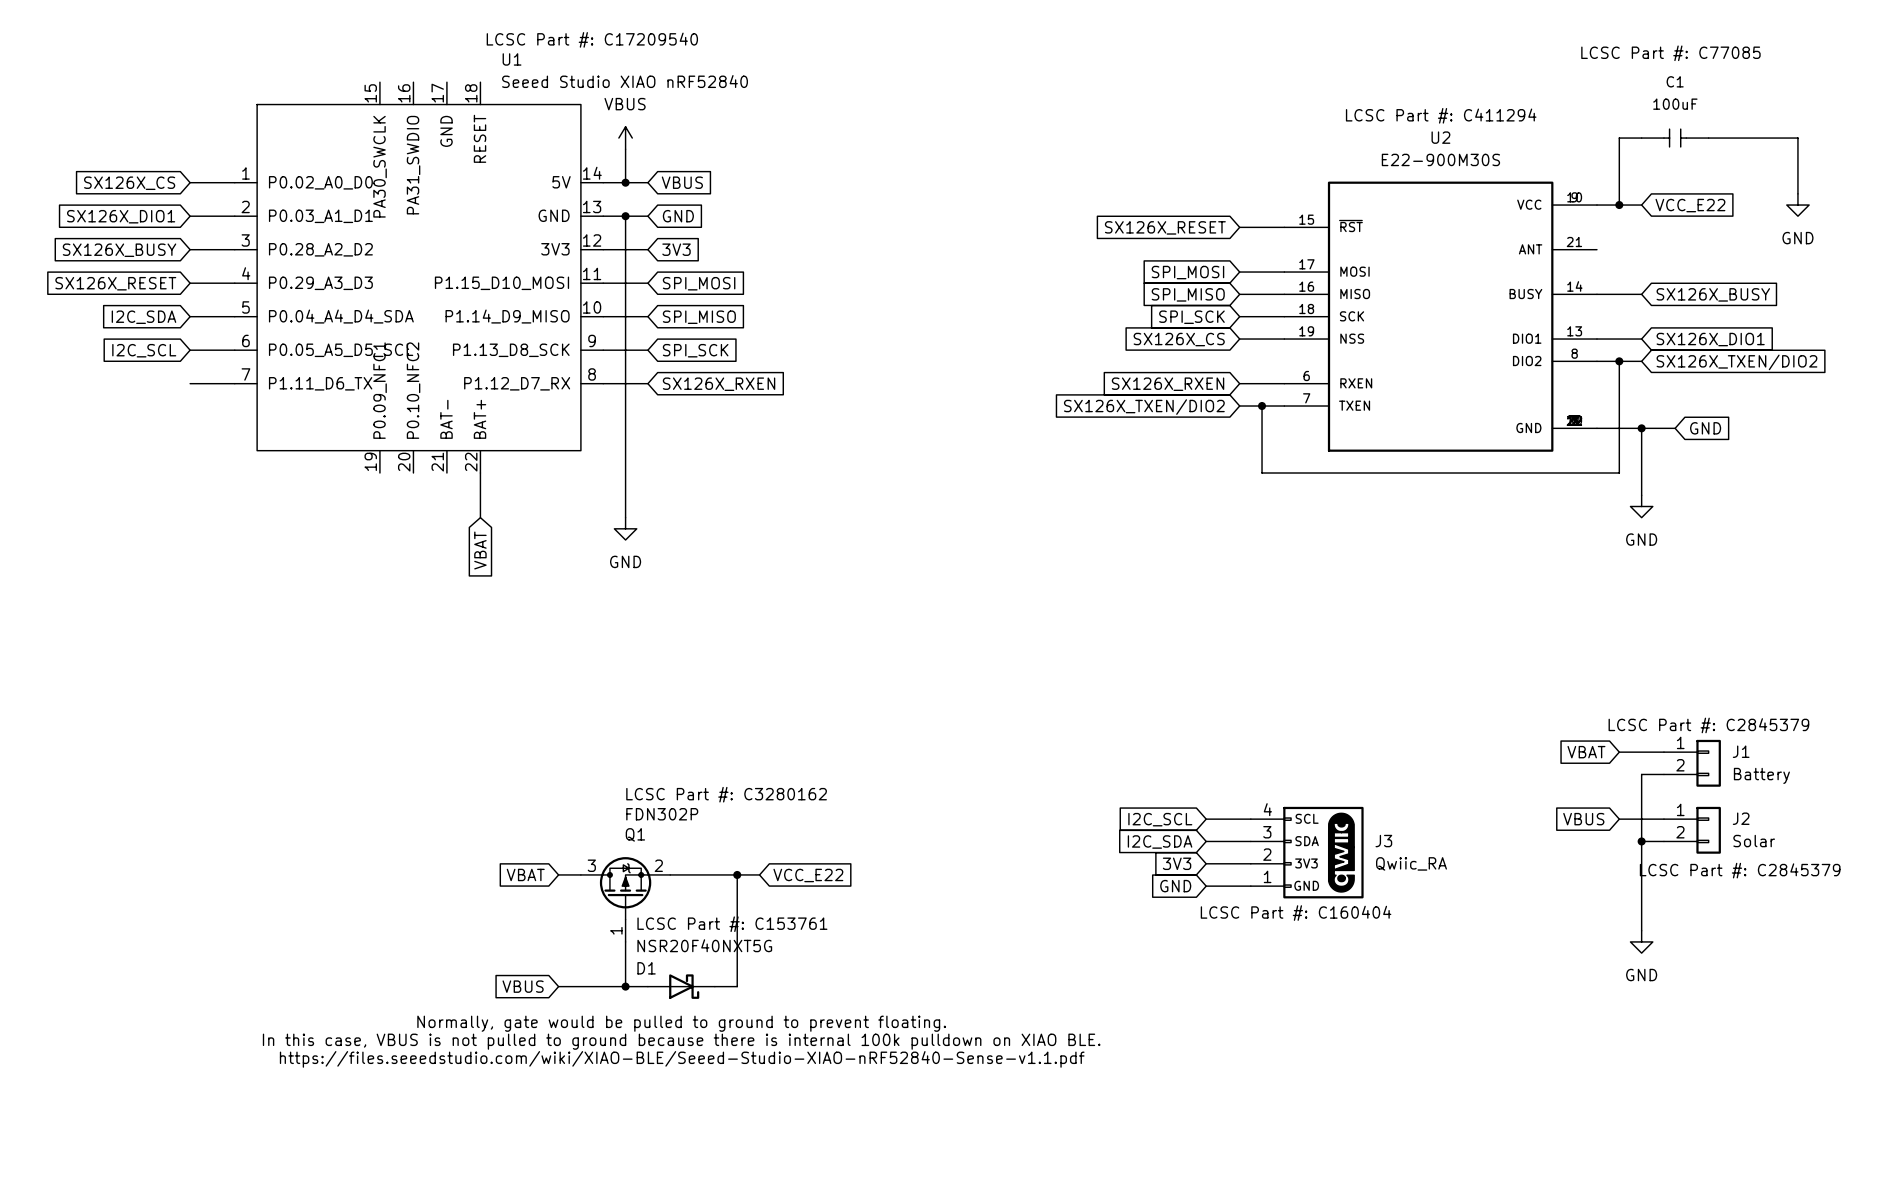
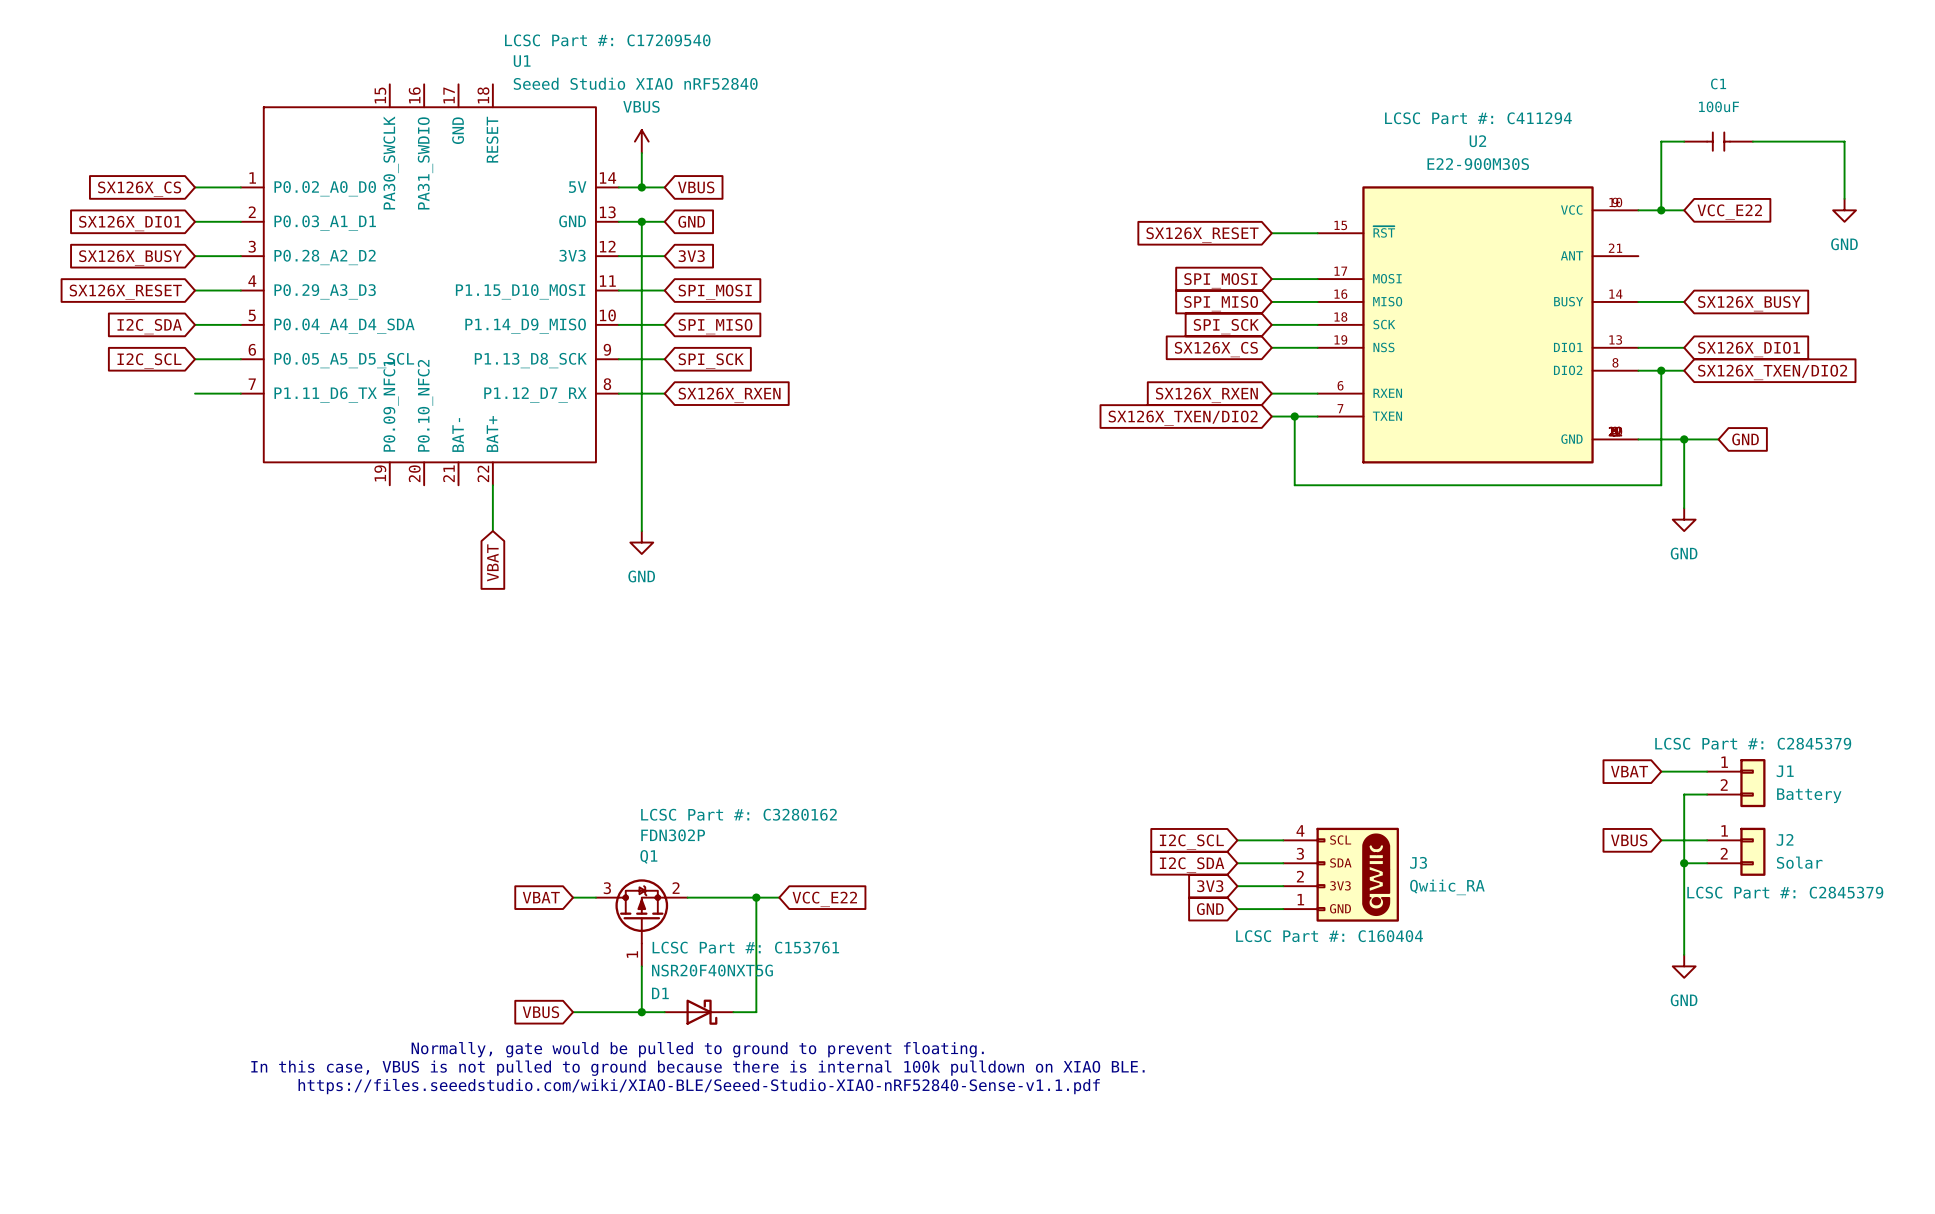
C1 text: LCSC Part #: C77085 (1670, 53) -> none

